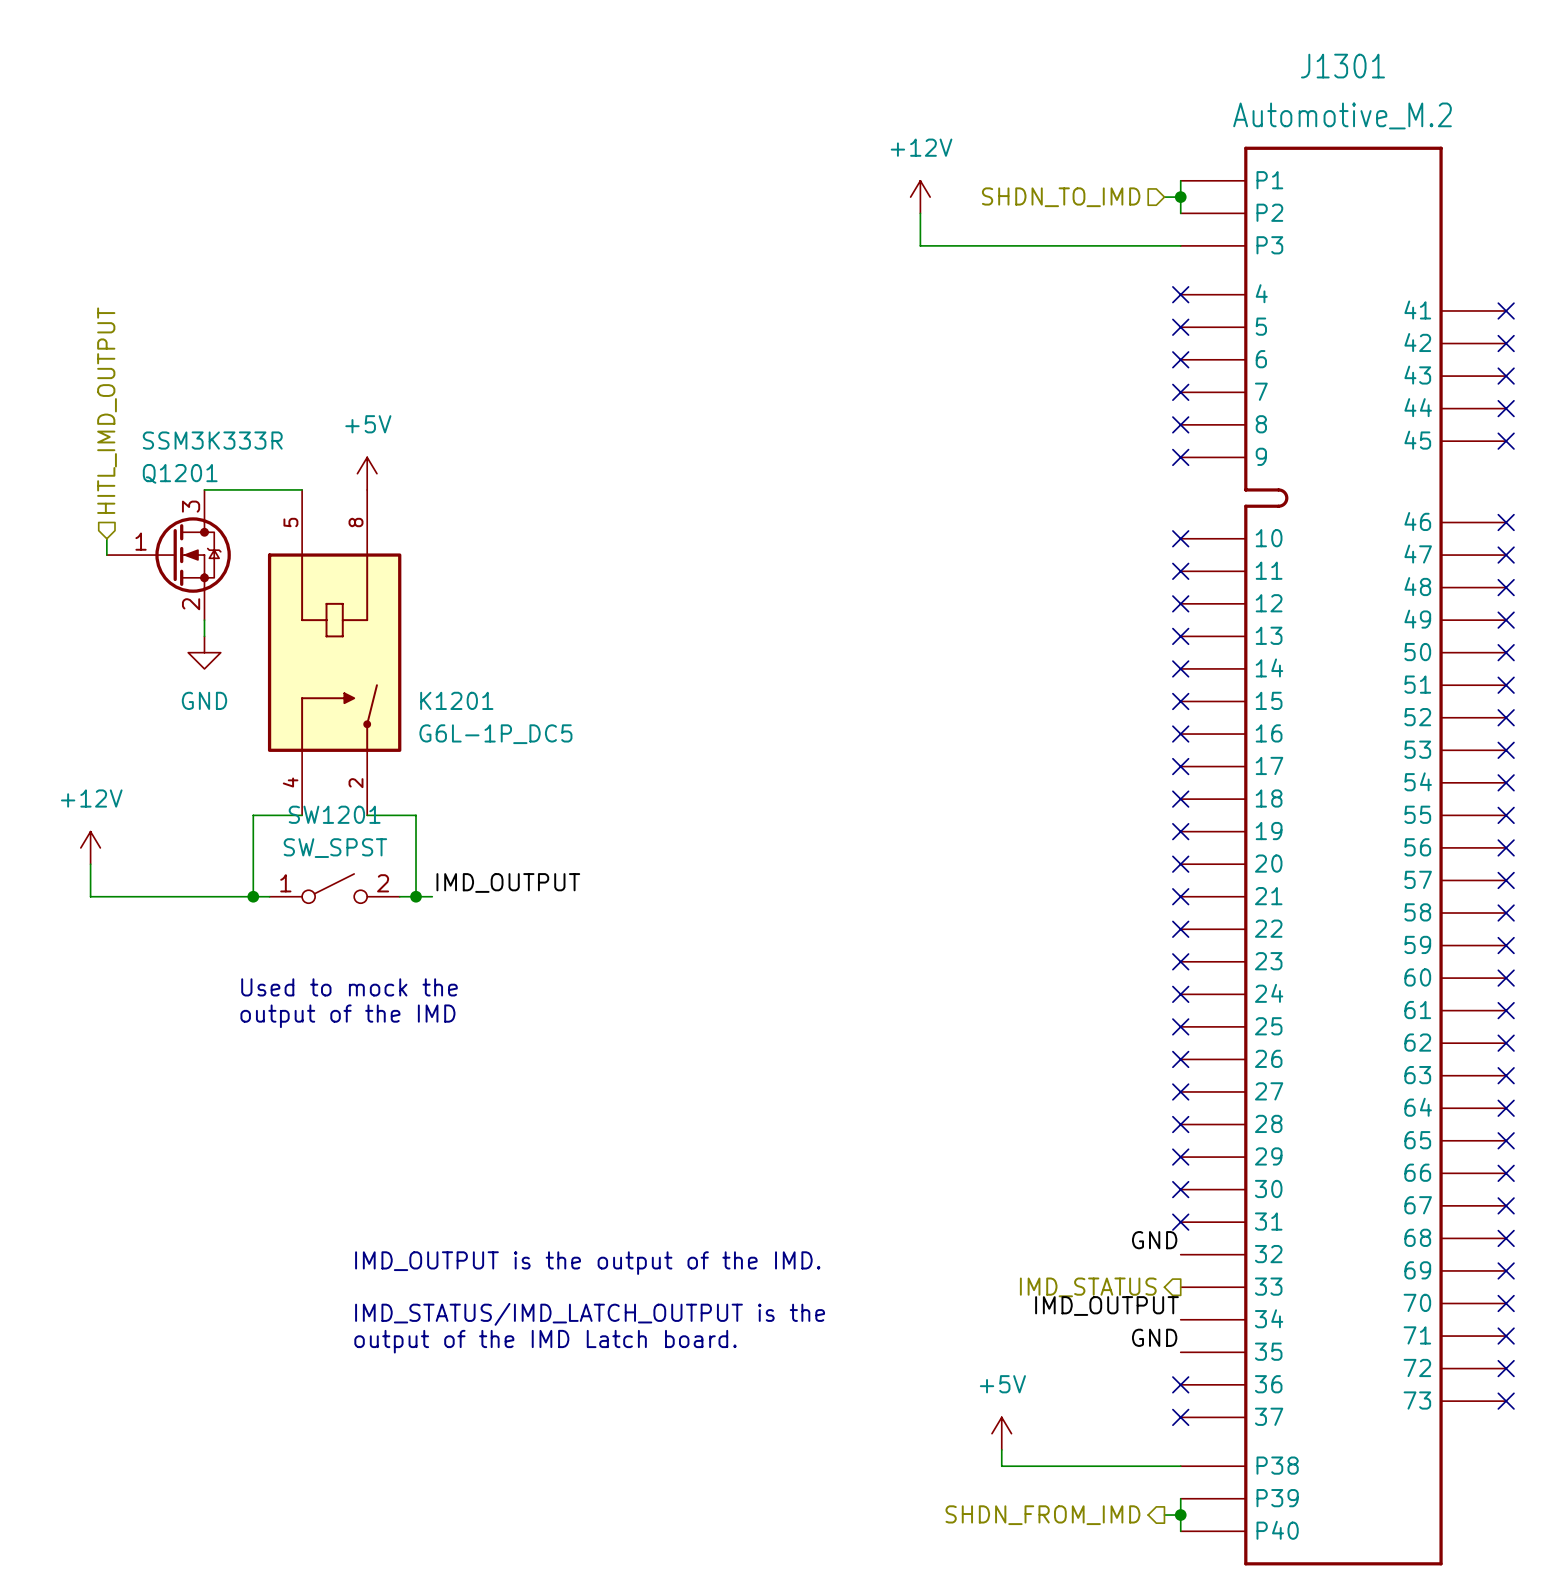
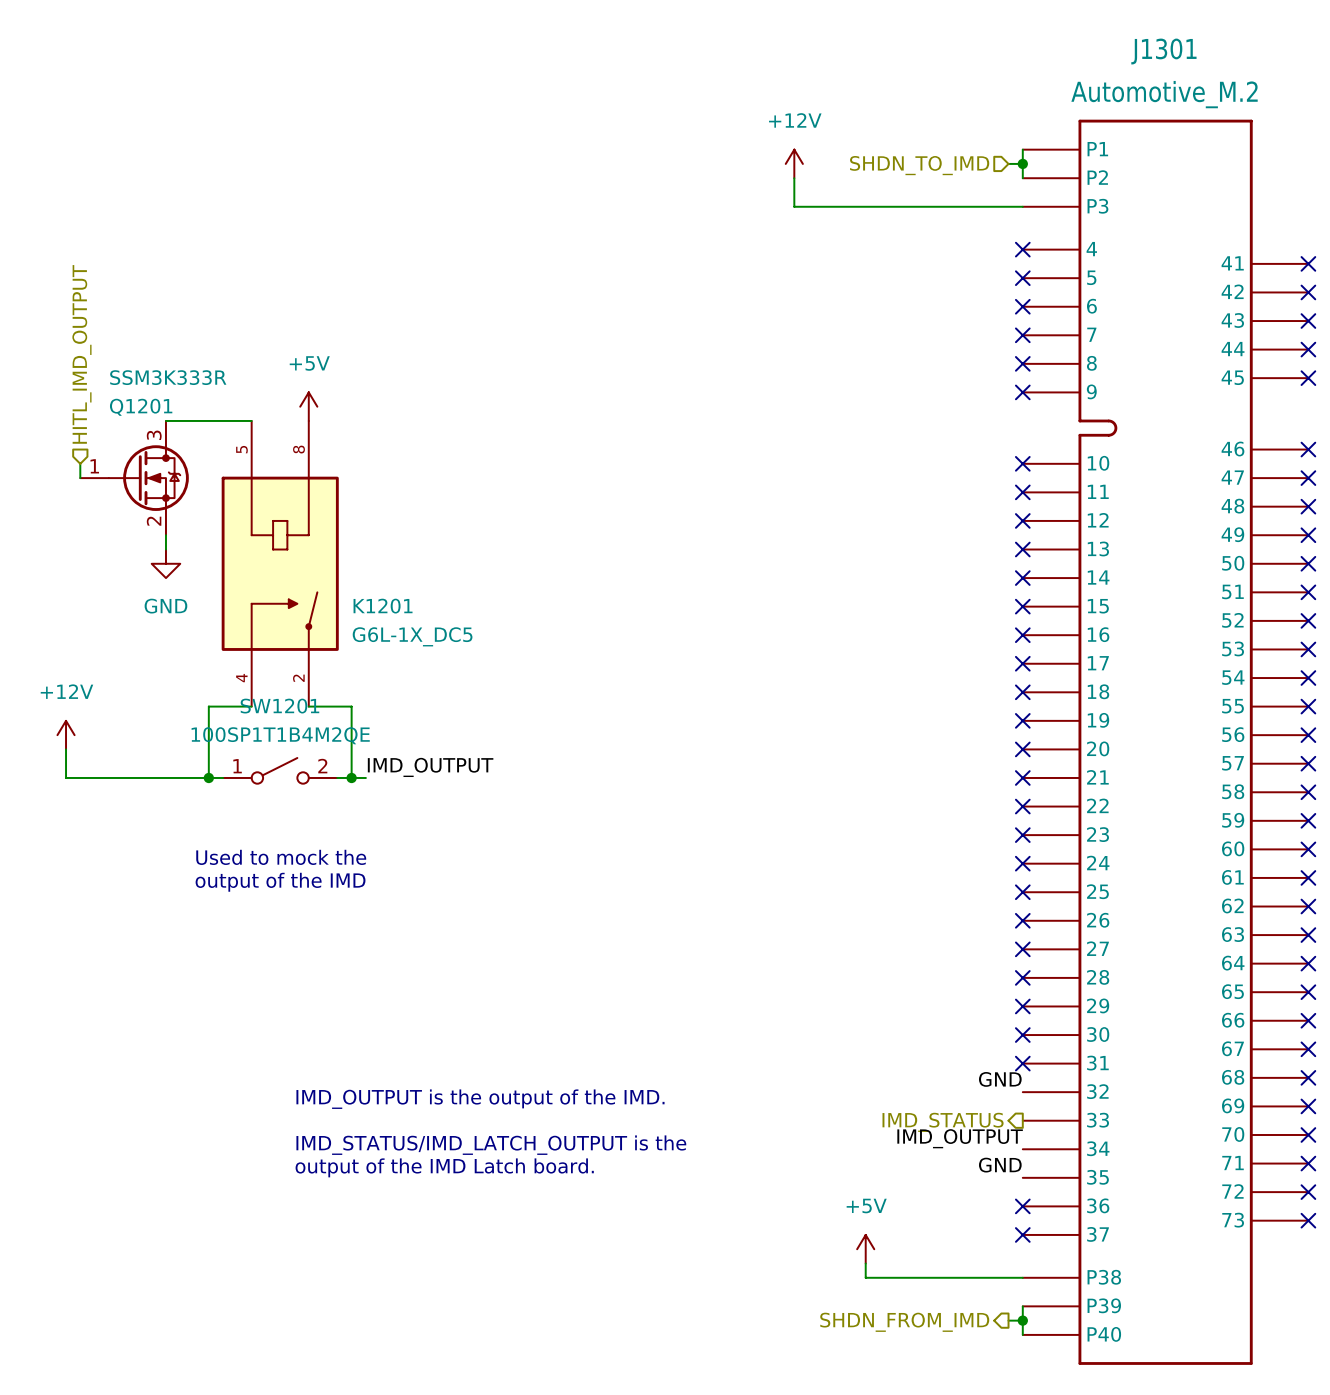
Q1201 symbol: [106, 489, 231, 621] -> [80, 420, 189, 536]
K1201 value: G6L-1P_DC5 (495, 734) -> G6L-1X_DC5 (412, 636)
SW1201 value: SW_SPST (335, 848) -> 100SP1T1B4M2QE (280, 735)

